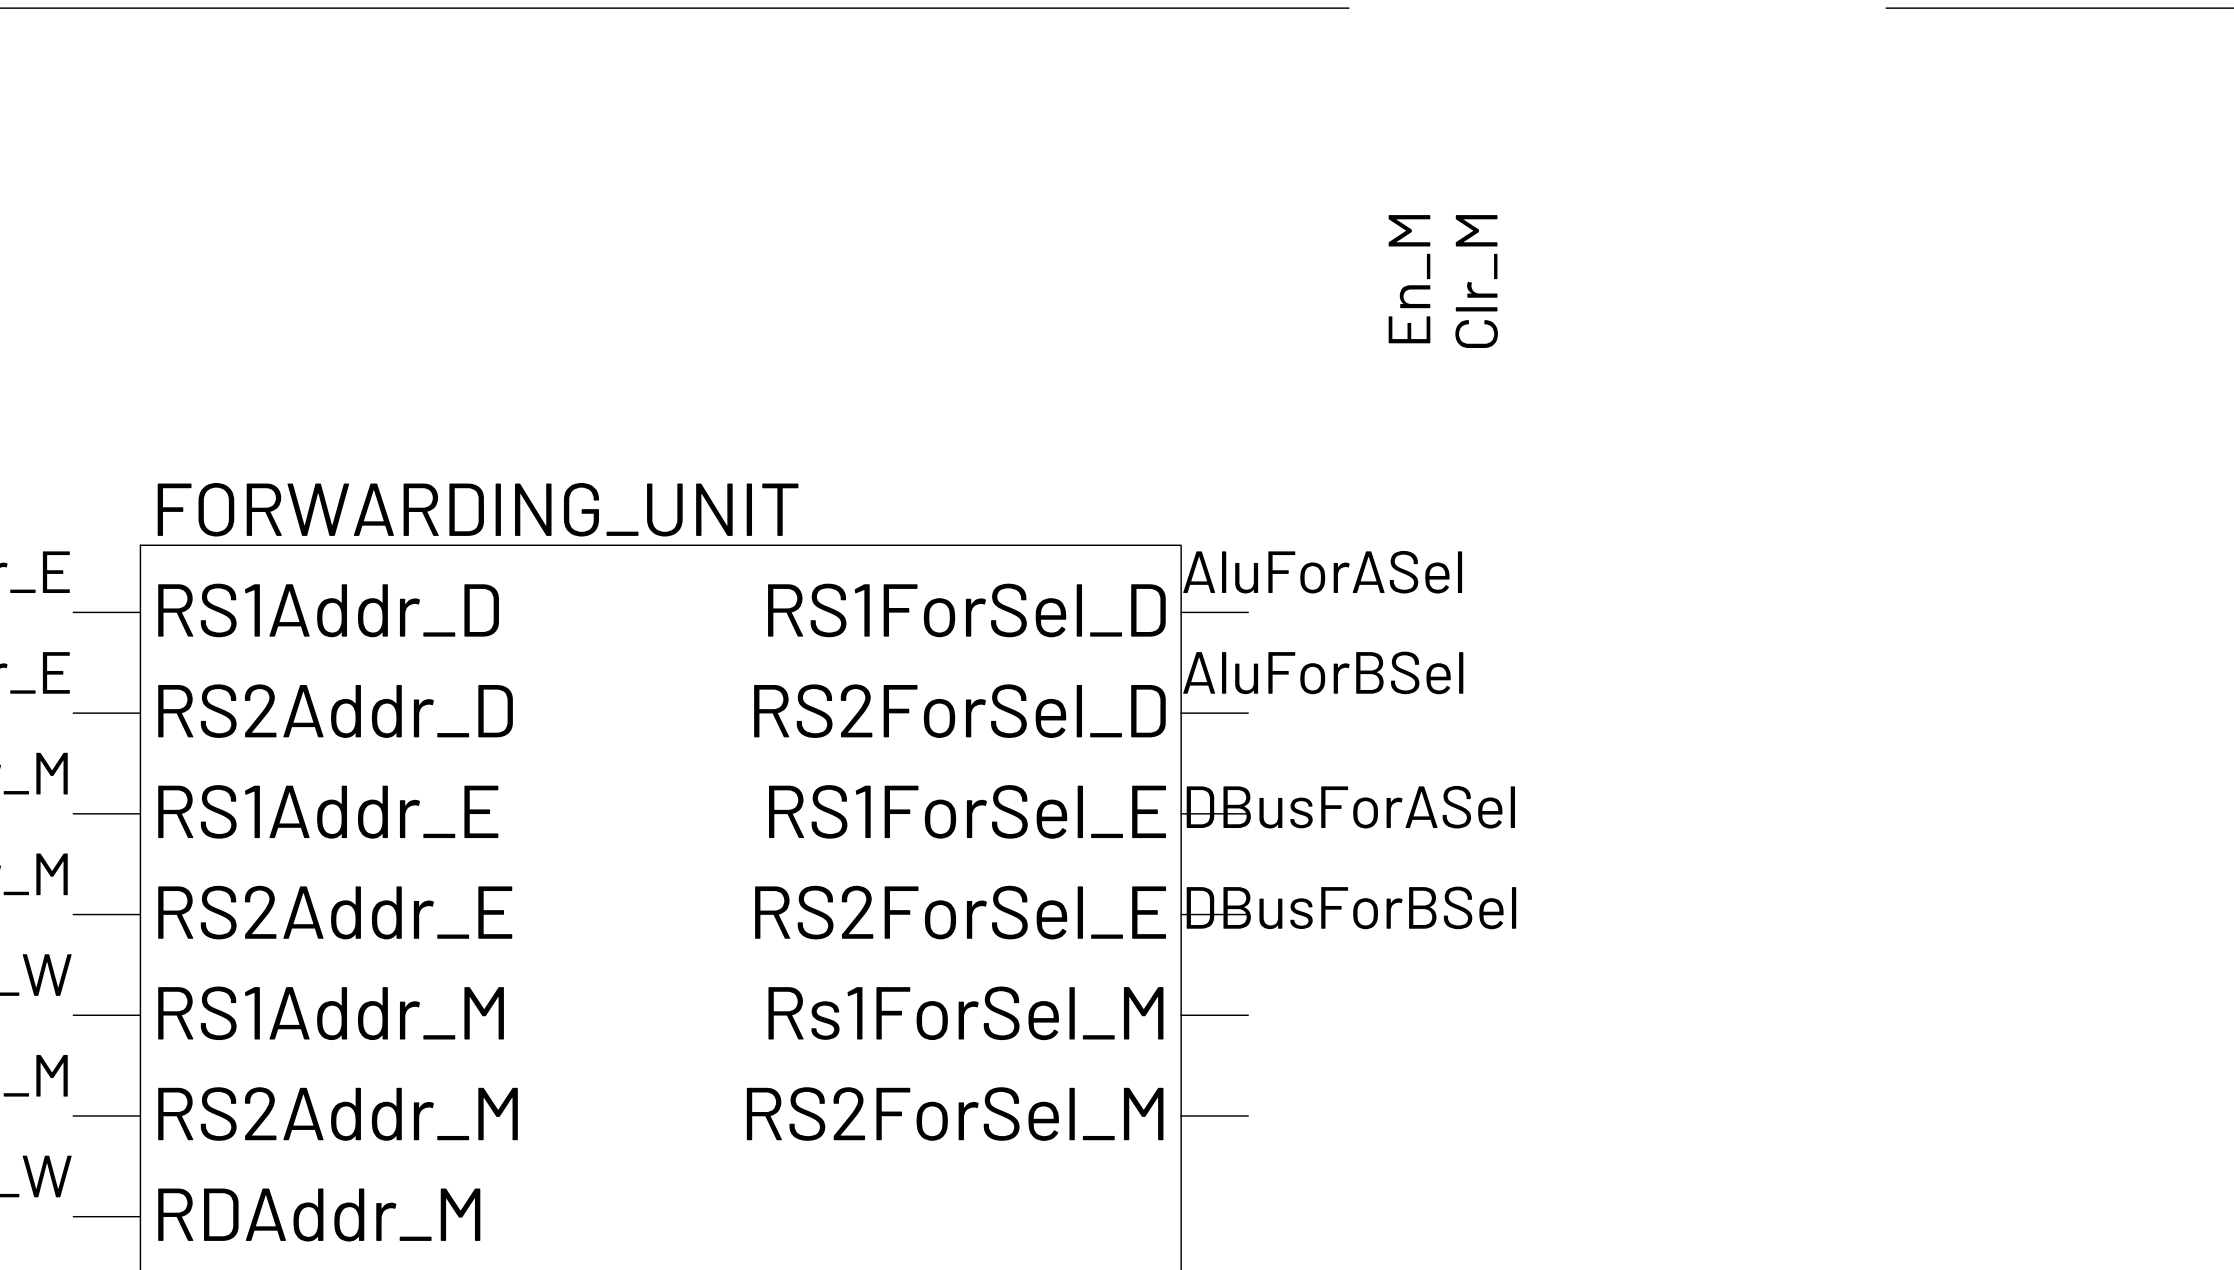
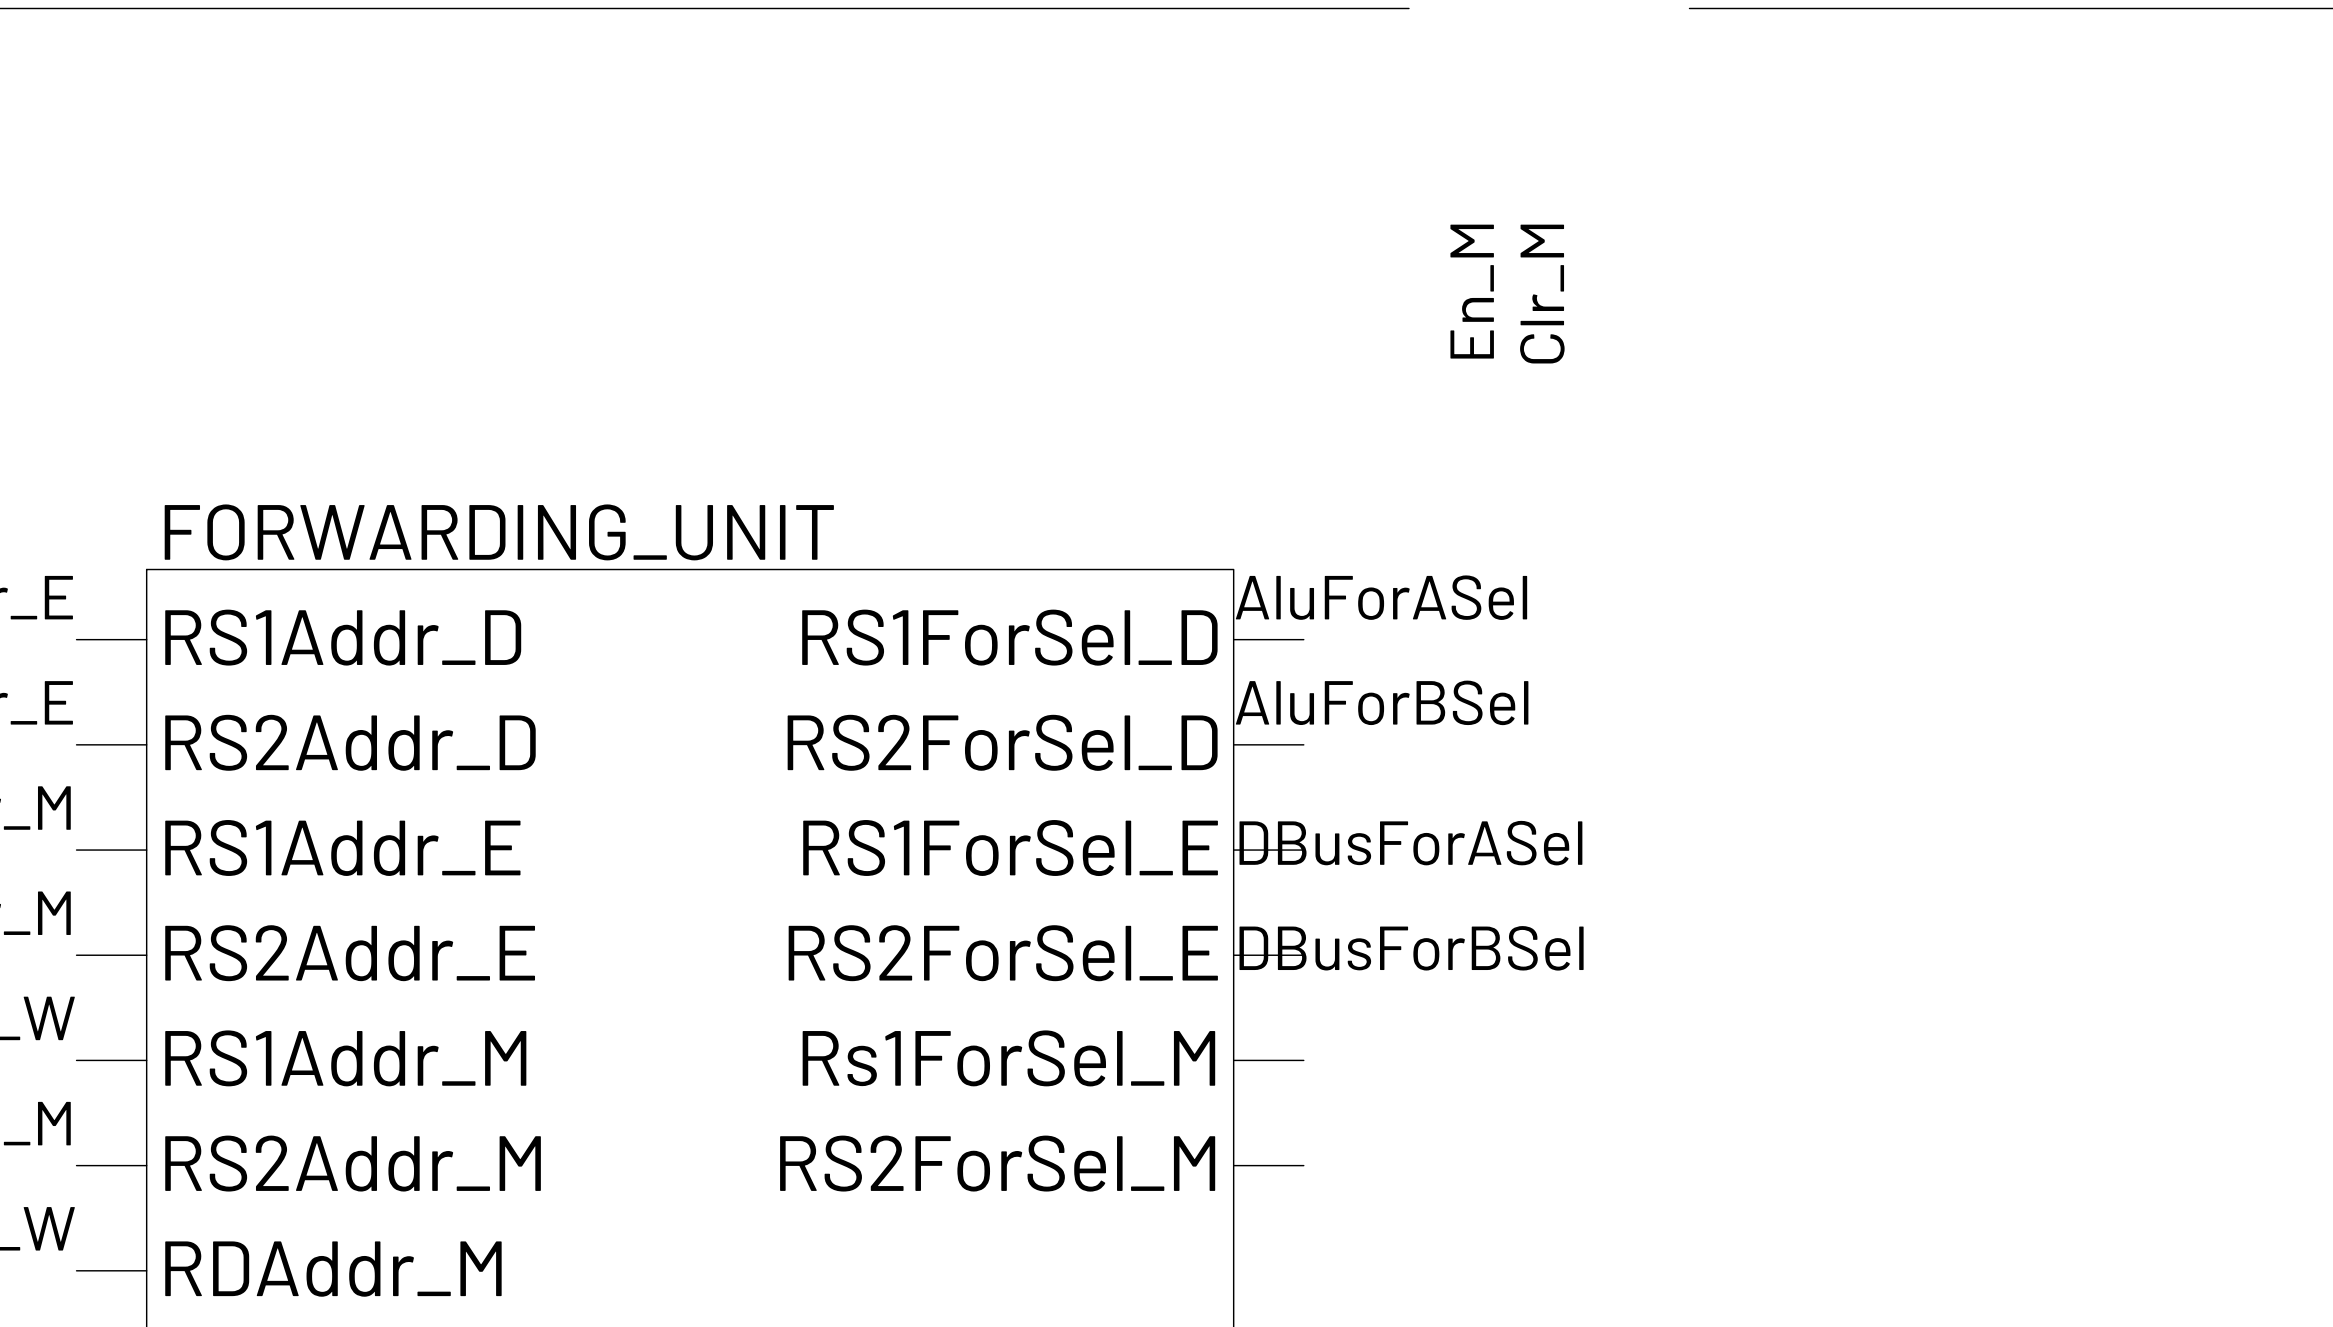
wire: none -> (1689, 8) (1970, 8)

